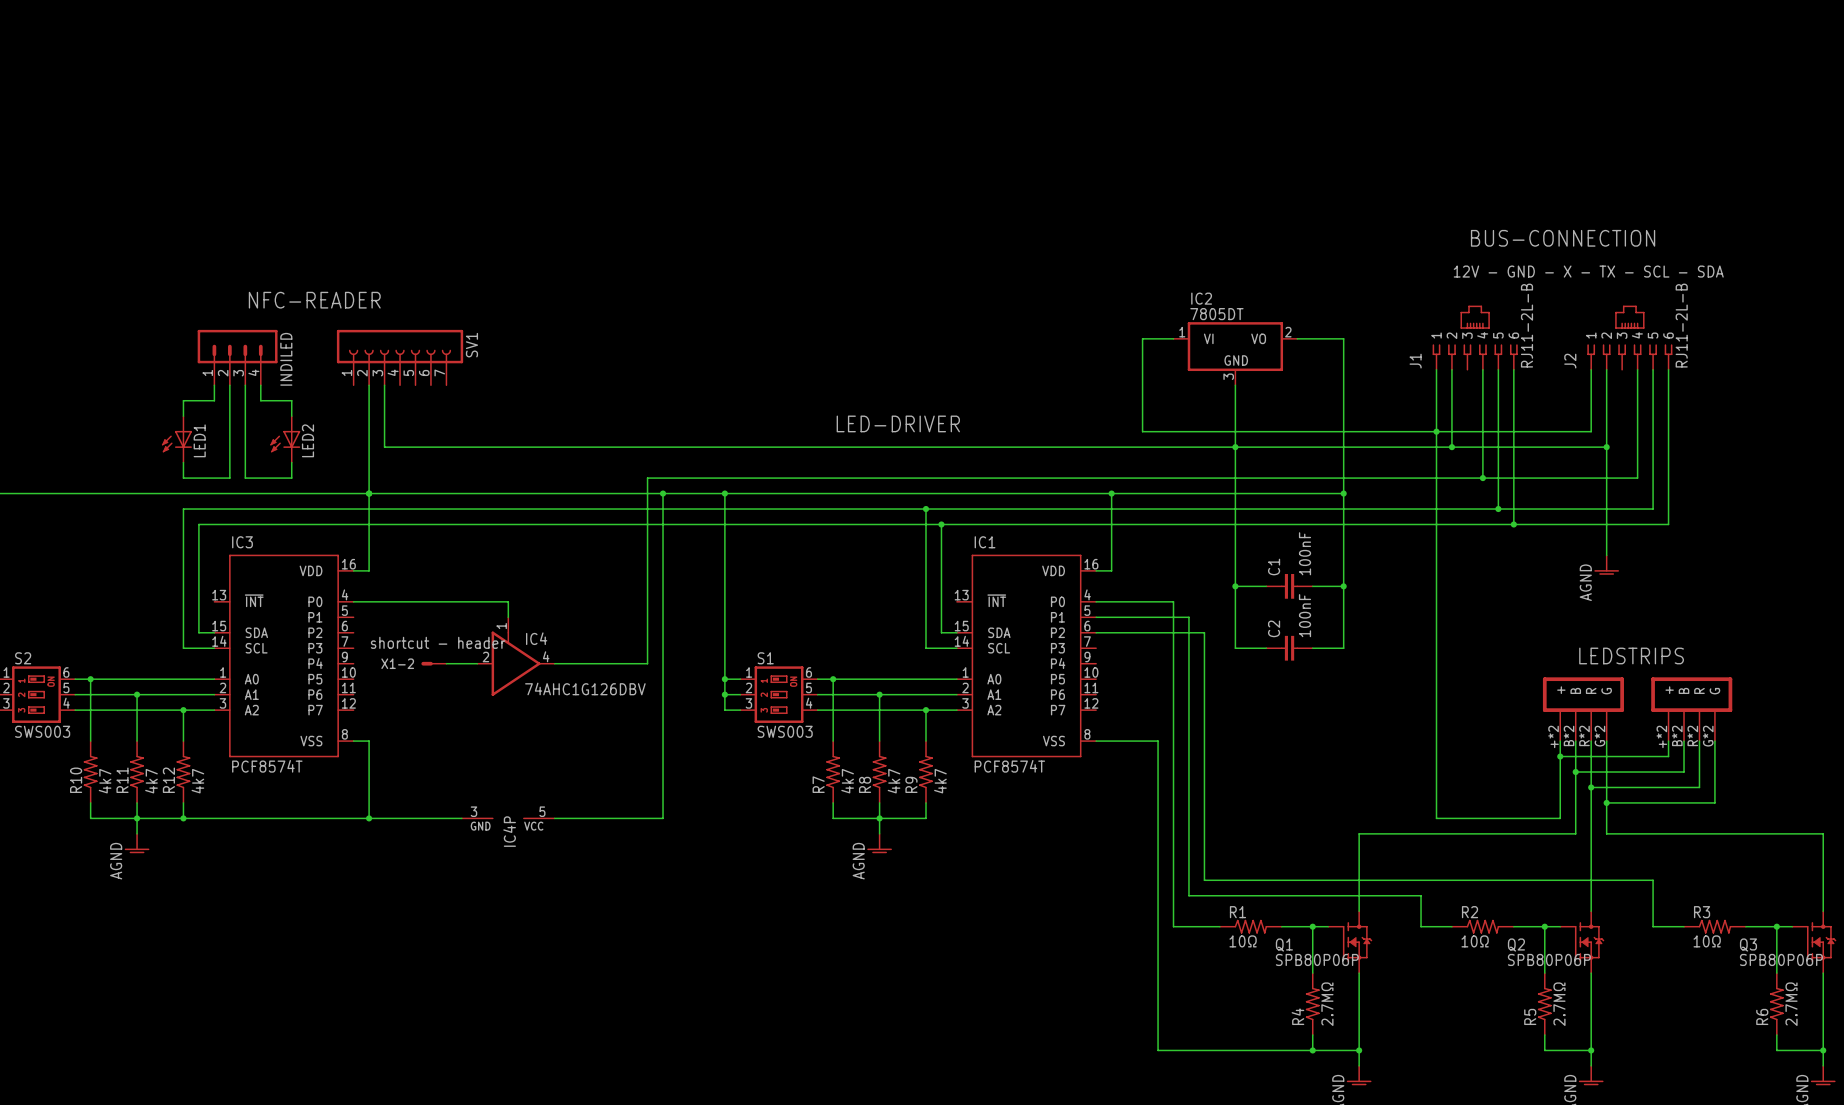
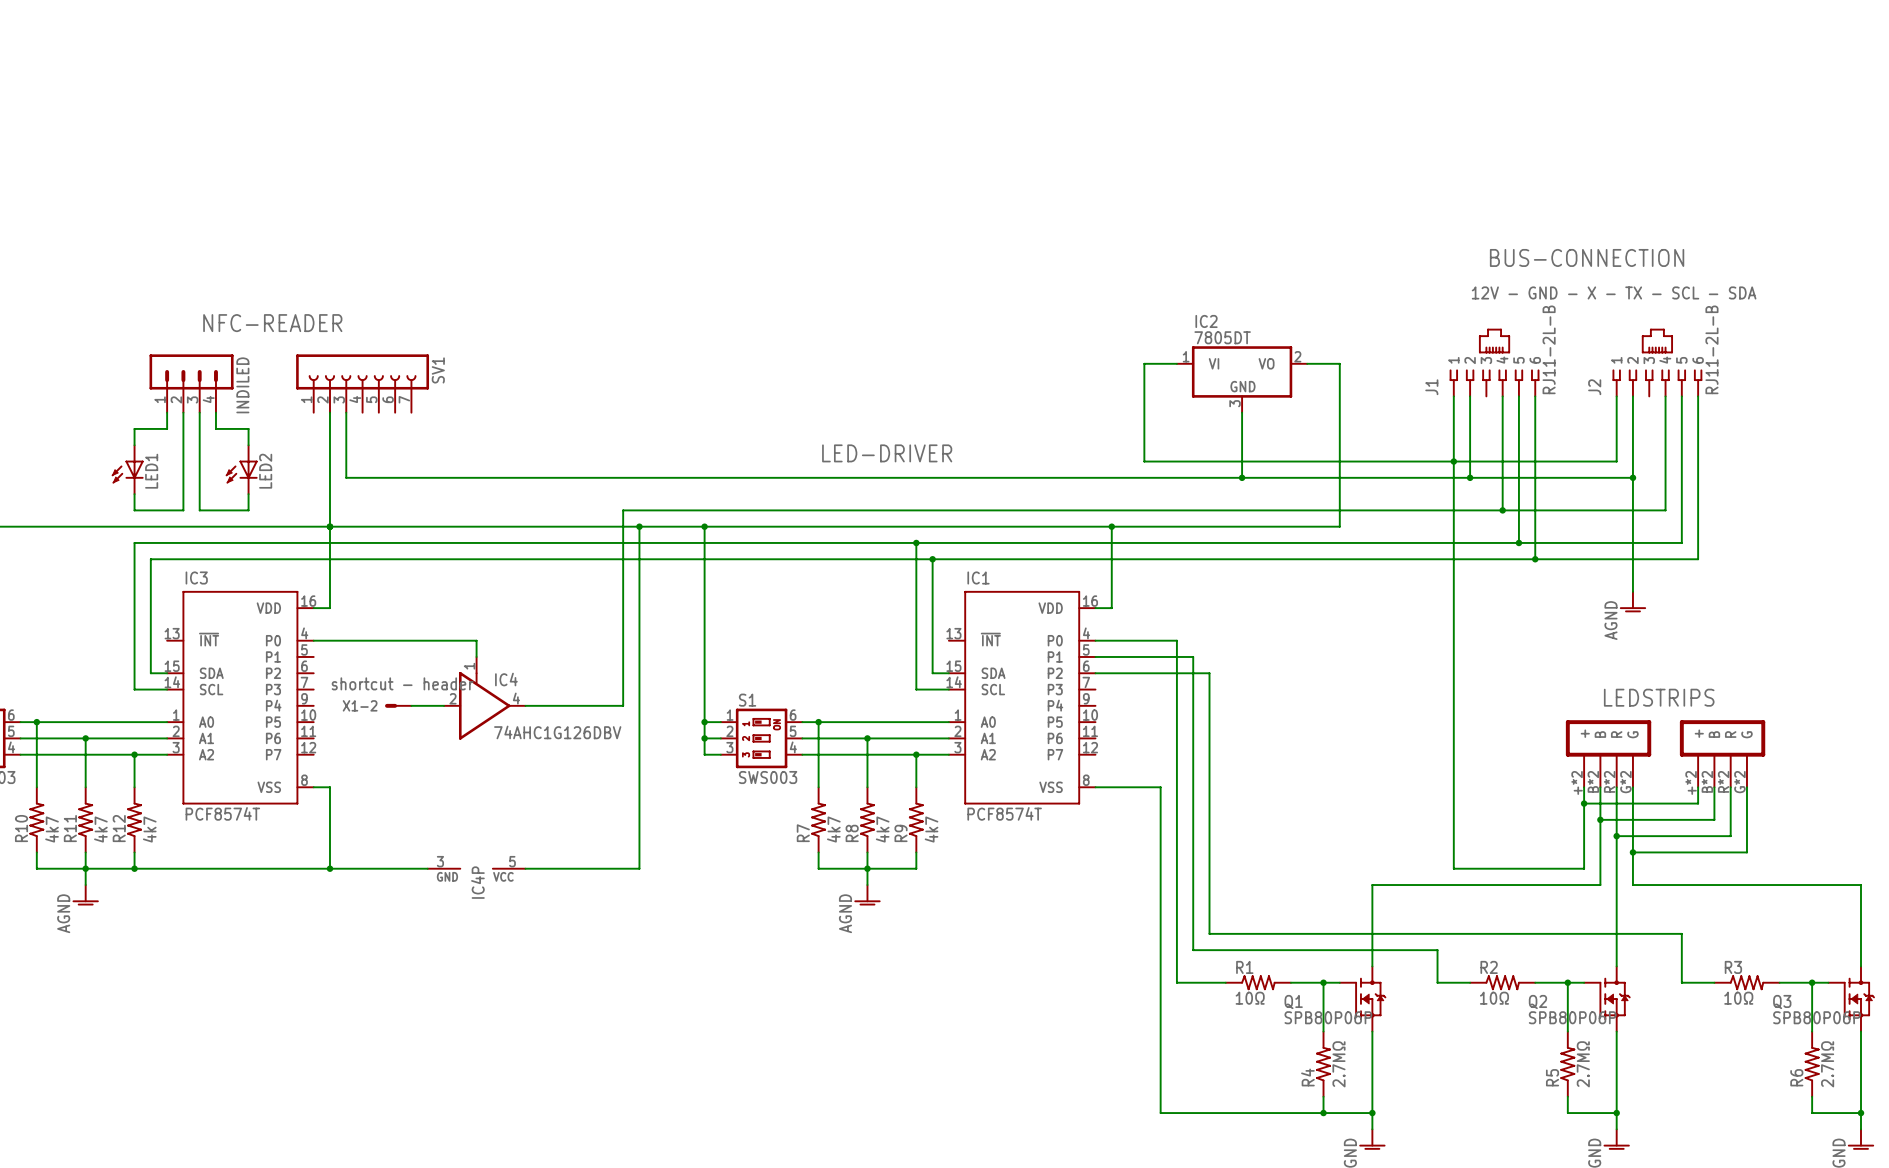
wire: (1328, 338) (1343, 338) (1343, 648) (1312, 648) -> (1339, 363) (1339, 526)
wire: (1235, 447) (1235, 648) (1266, 648) -> none
wire: (1328, 493) (1343, 493) -> none
junction: (1343, 493) -> none
wire: (1235, 586) (1266, 586) -> none
junction: (1235, 586) -> none
C1: 100nF (1289, 586) -> none
wire: (1312, 586) (1343, 586) -> none
junction: (1343, 586) -> none
C2: 100nF (1289, 648) -> none

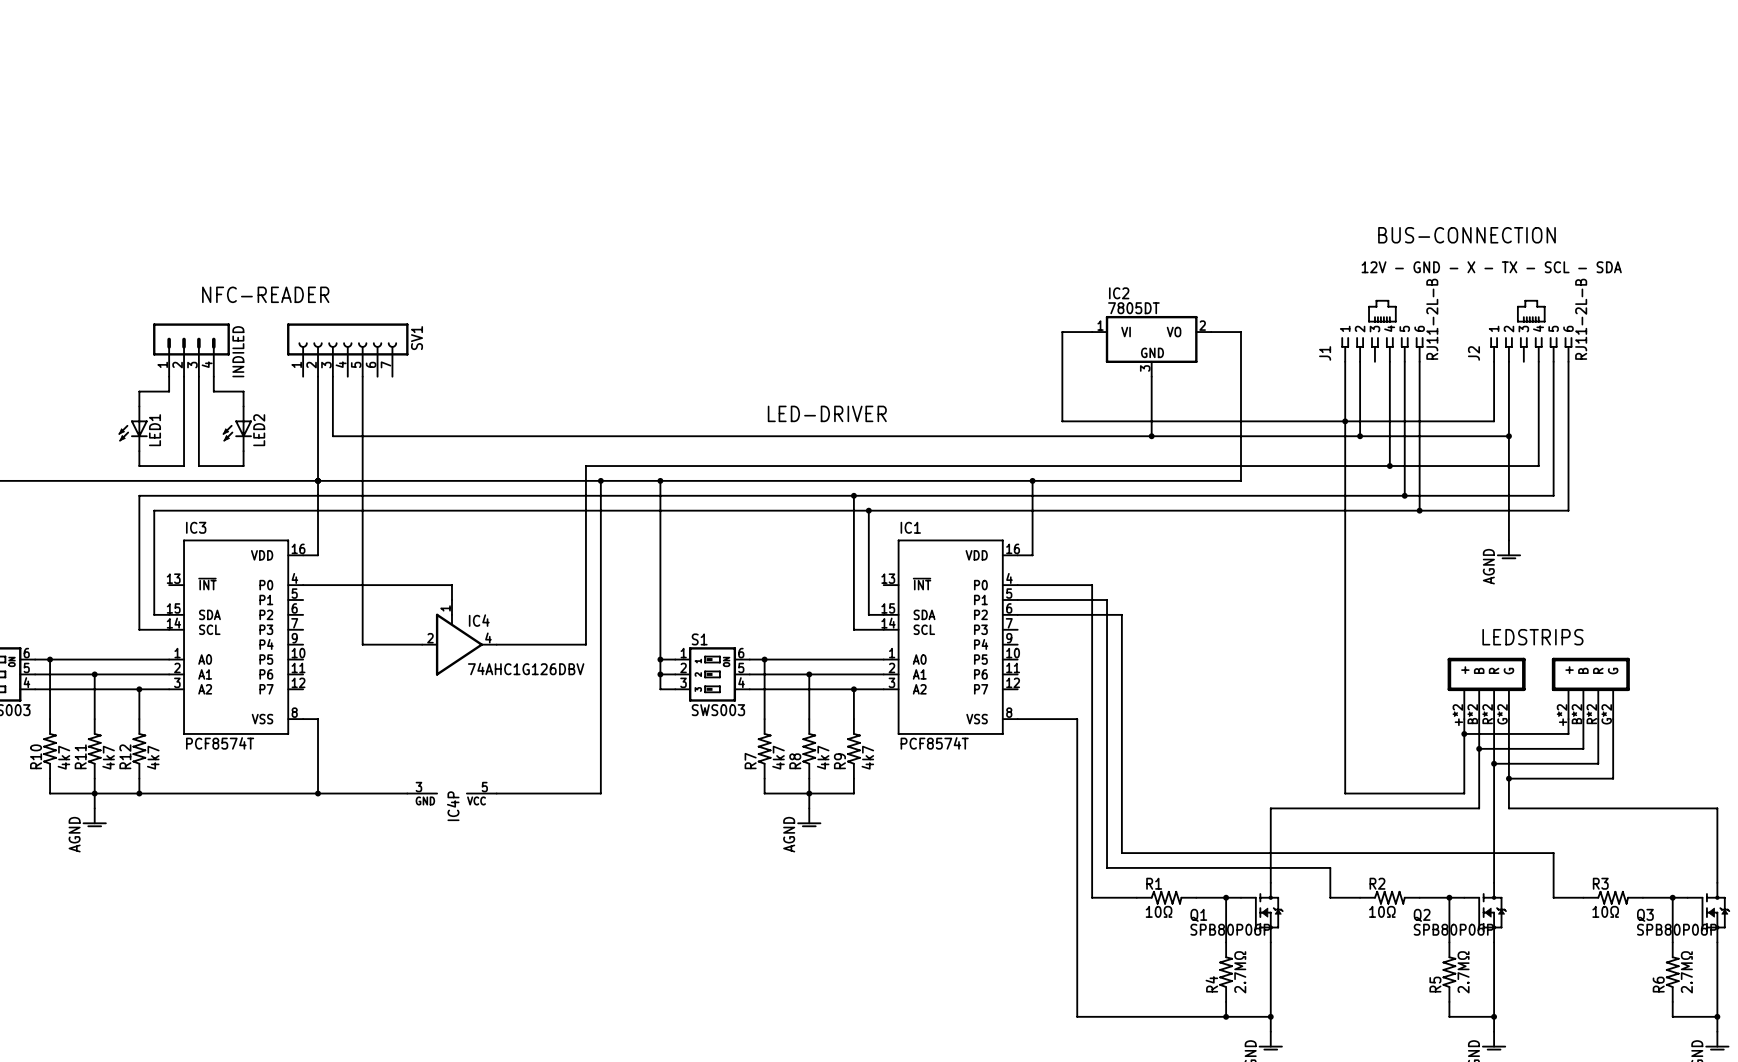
wire: none -> (362, 376) (362, 644) (392, 644)
text: shortcut - header (402, 683) -> none
X1-2: (398, 705) -> none

